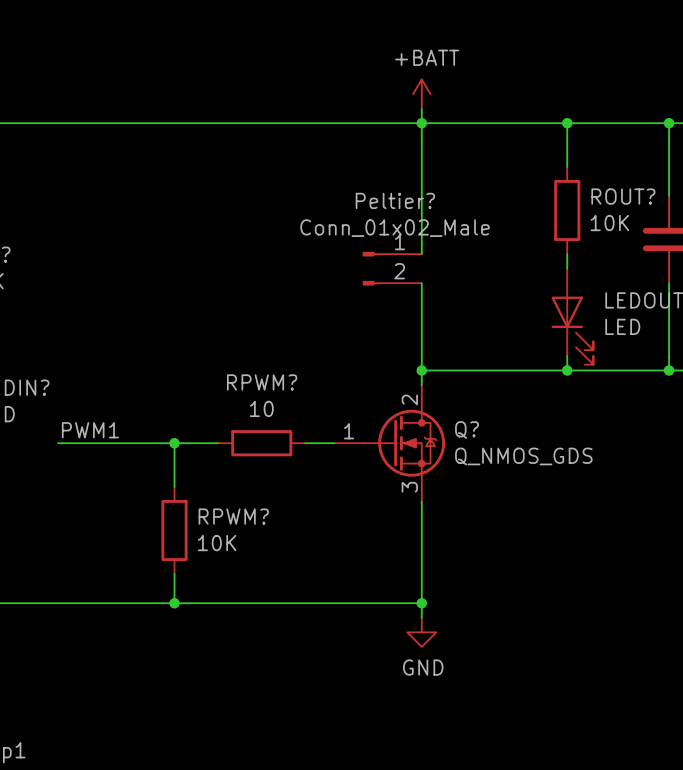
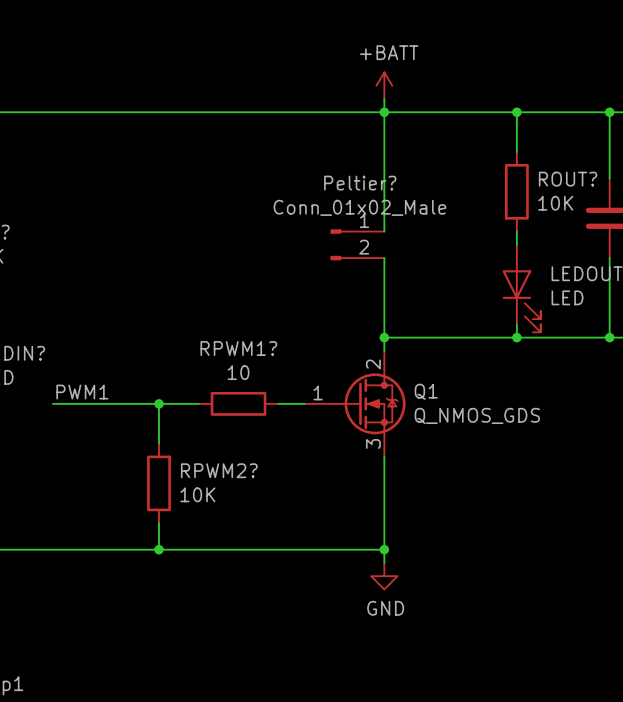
RPWM? name: RPWM? (262, 382) -> RPWM1? (238, 348)
Q? name: Q? (467, 429) -> Q1 (426, 391)
RPWM? name: RPWM? (233, 516) -> RPWM2? (219, 470)

